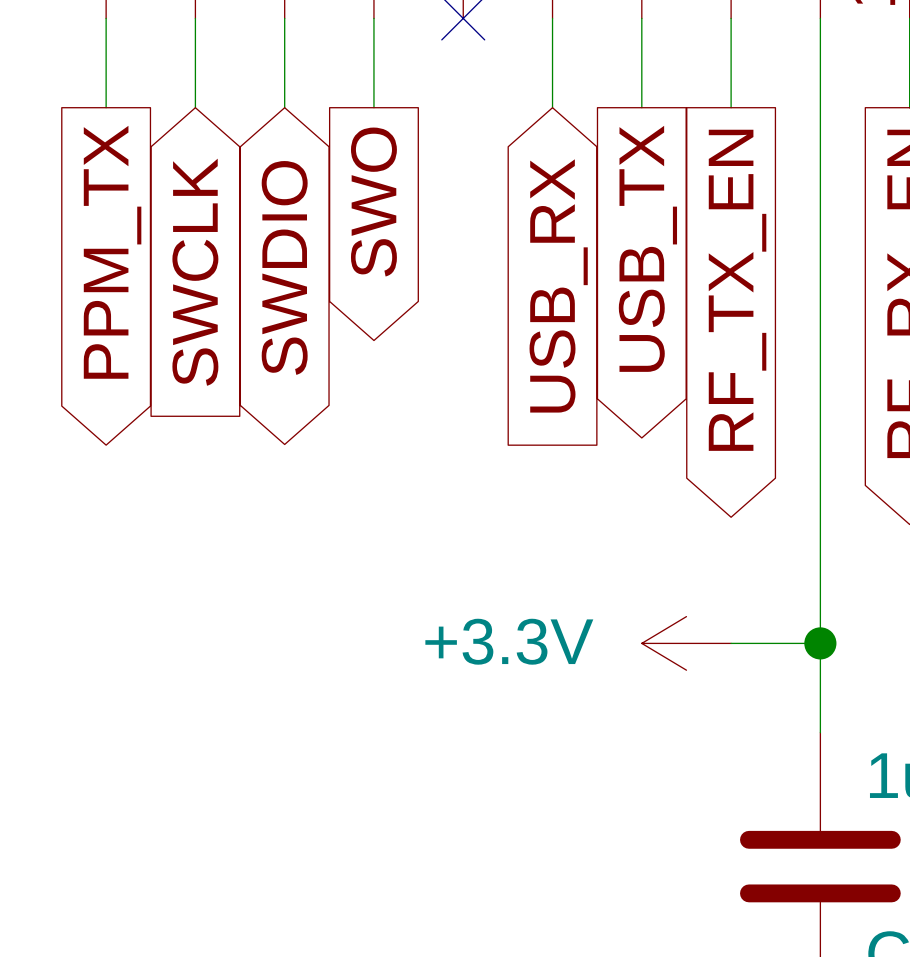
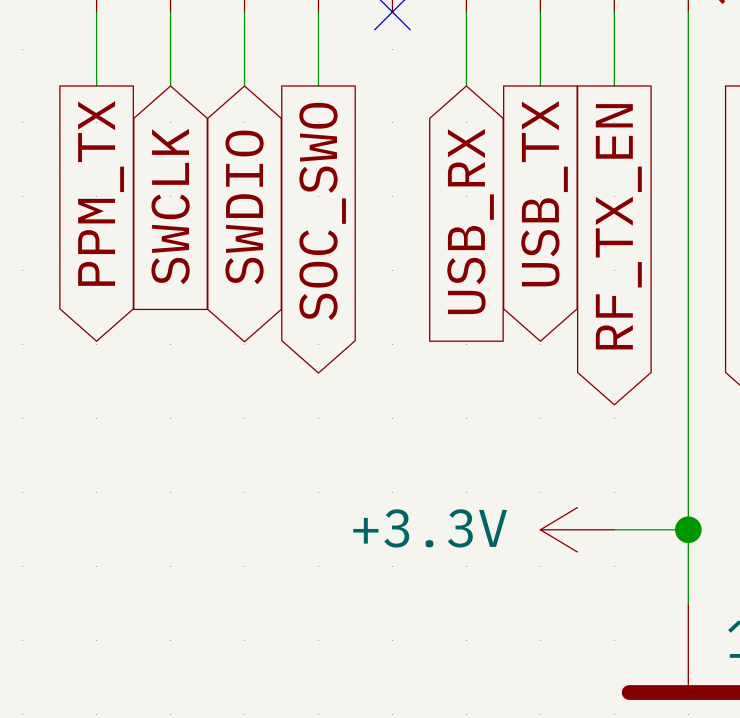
global label: SWO (373, 202) -> SOC_SWO (322, 211)

